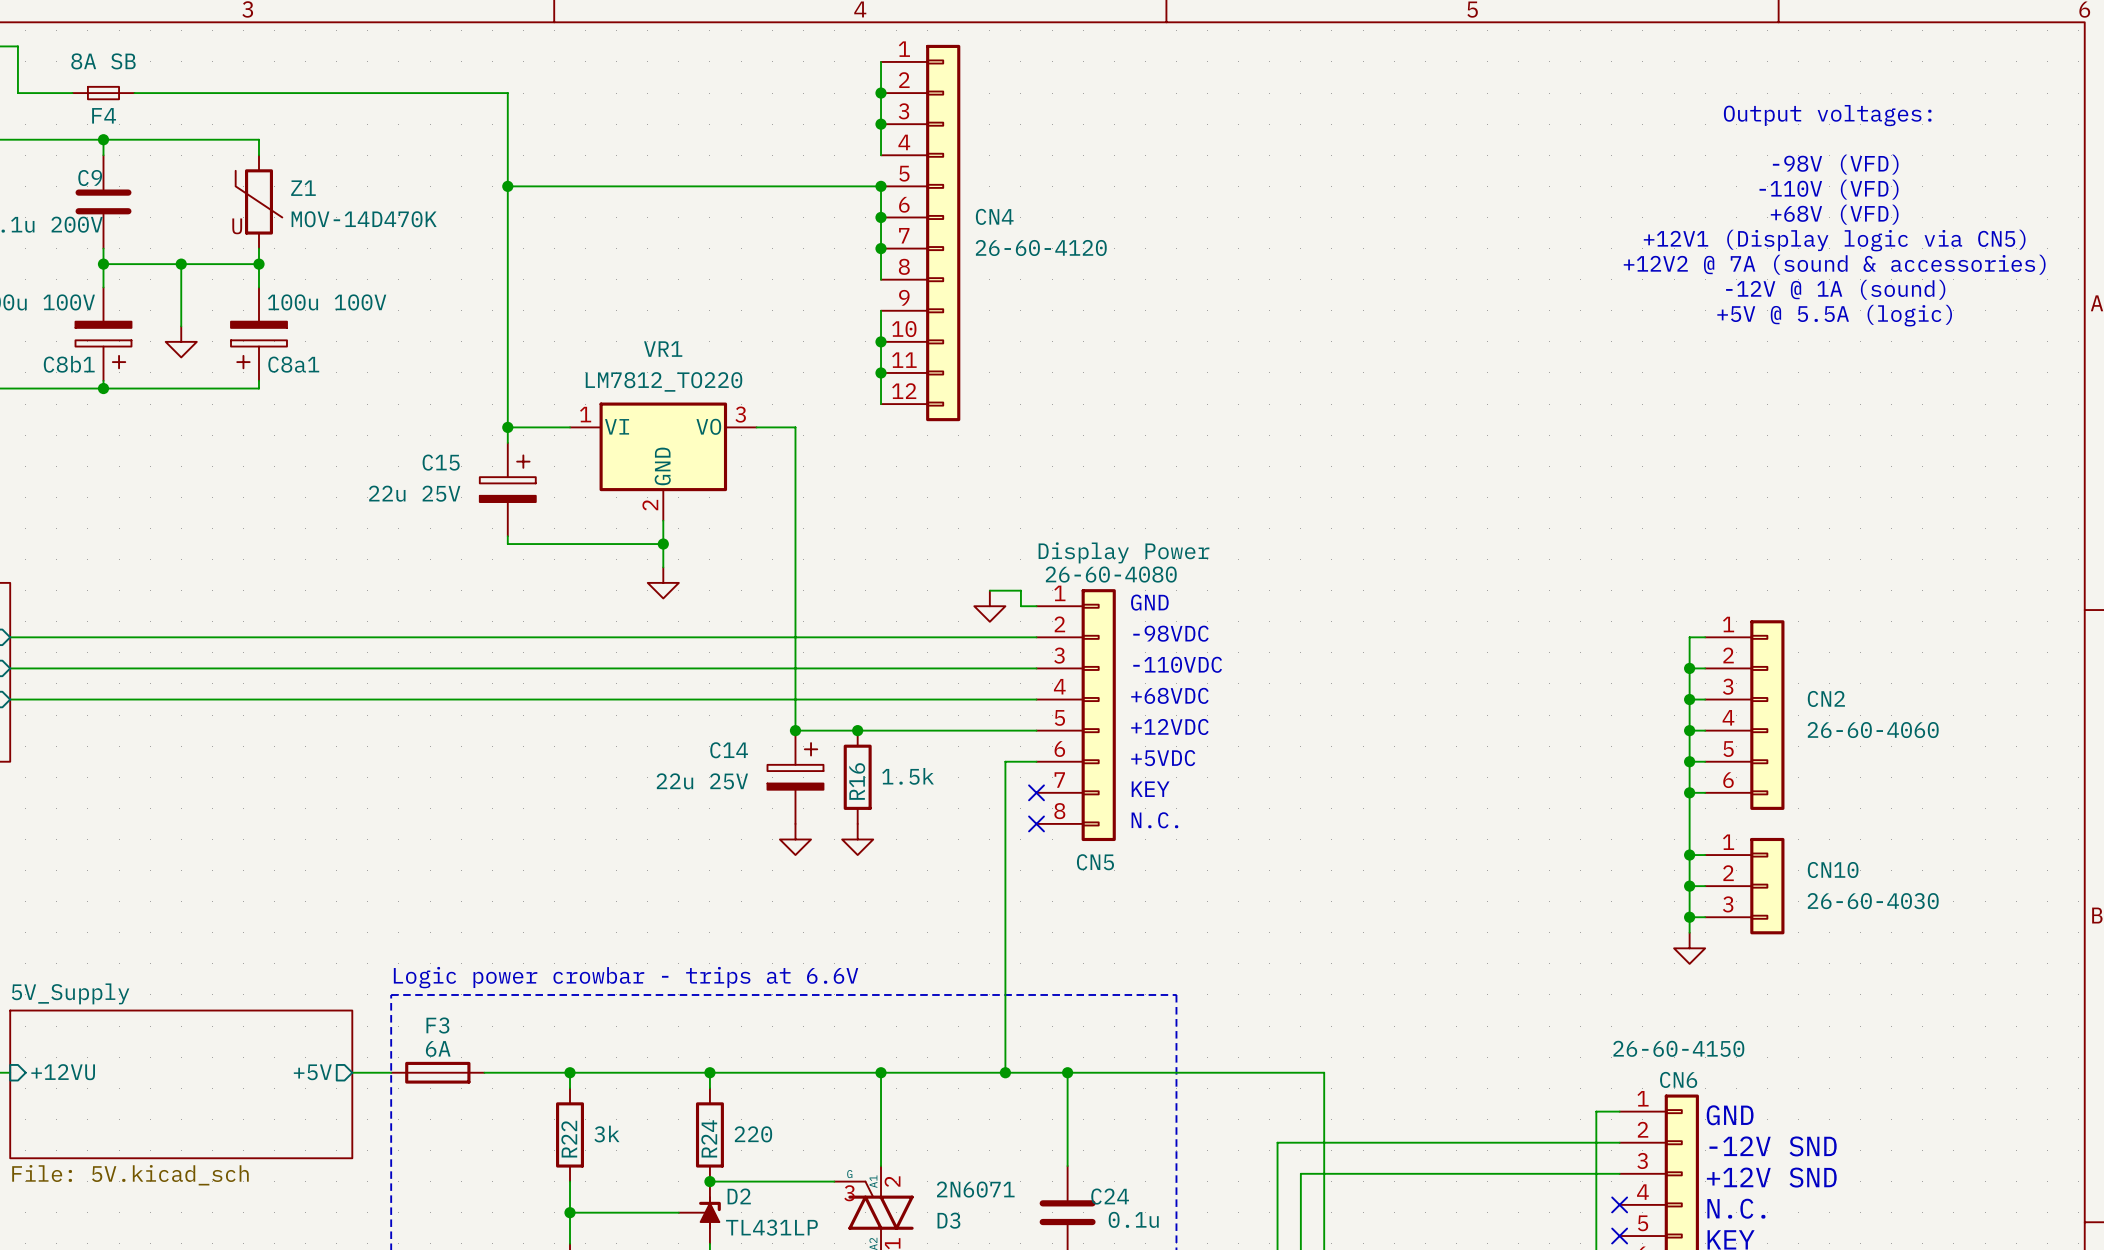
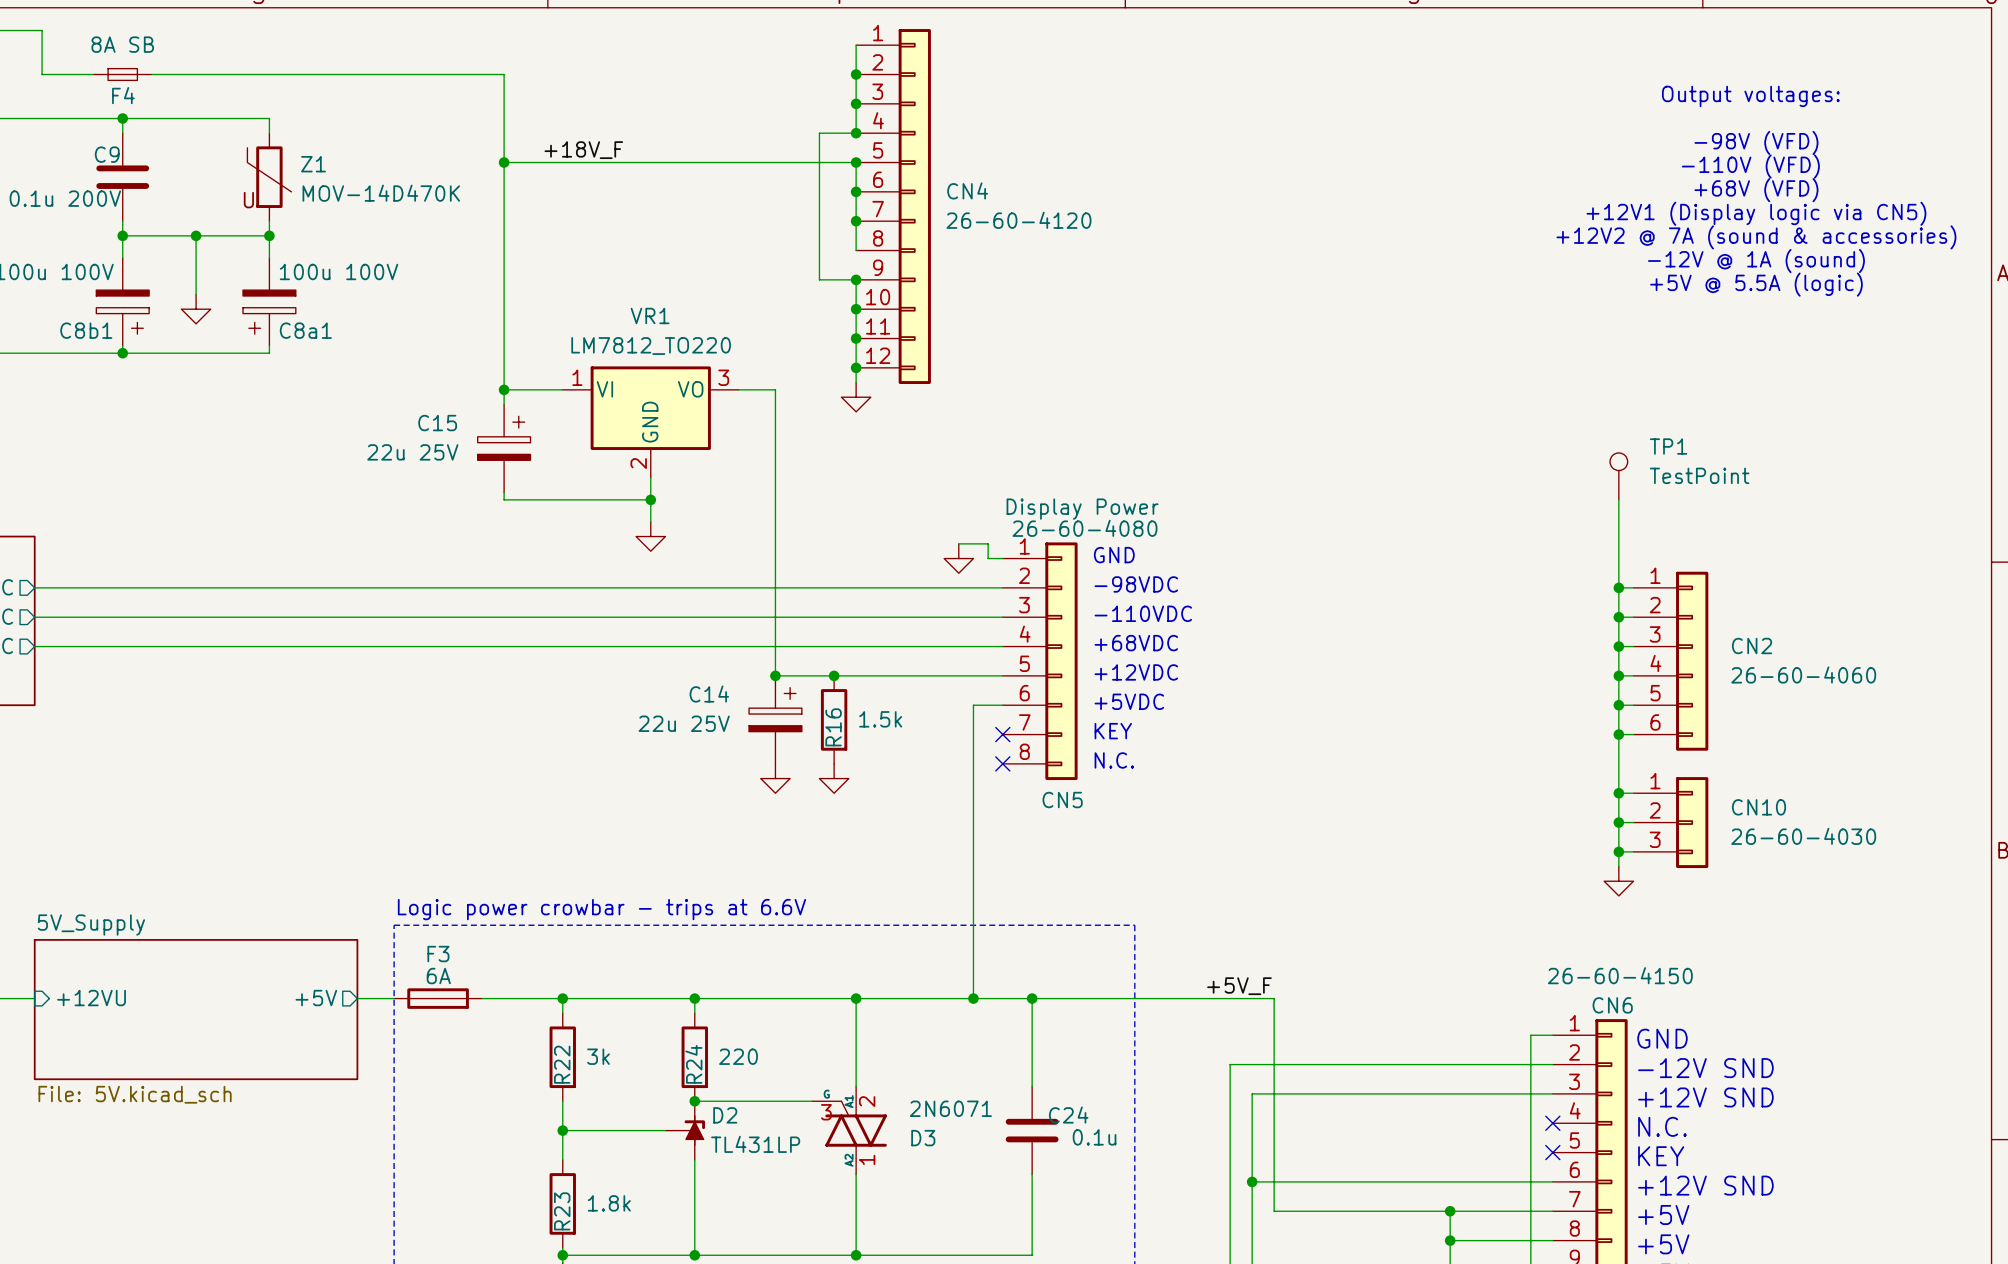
wire: none -> (856, 133) (819, 133) (819, 279) (856, 279)
junction: none -> (856, 133)
label: none -> +18V_F (583, 150)
junction: none -> (856, 279)
wire: none -> (856, 367) (856, 382)
junction: none -> (856, 367)
power symbol: none -> (856, 397)
TP1: none -> TestPoint (1618, 476)
wire: none -> (1618, 499) (1618, 587)
junction: none -> (1618, 587)
label: none -> +5V_F (1239, 986)

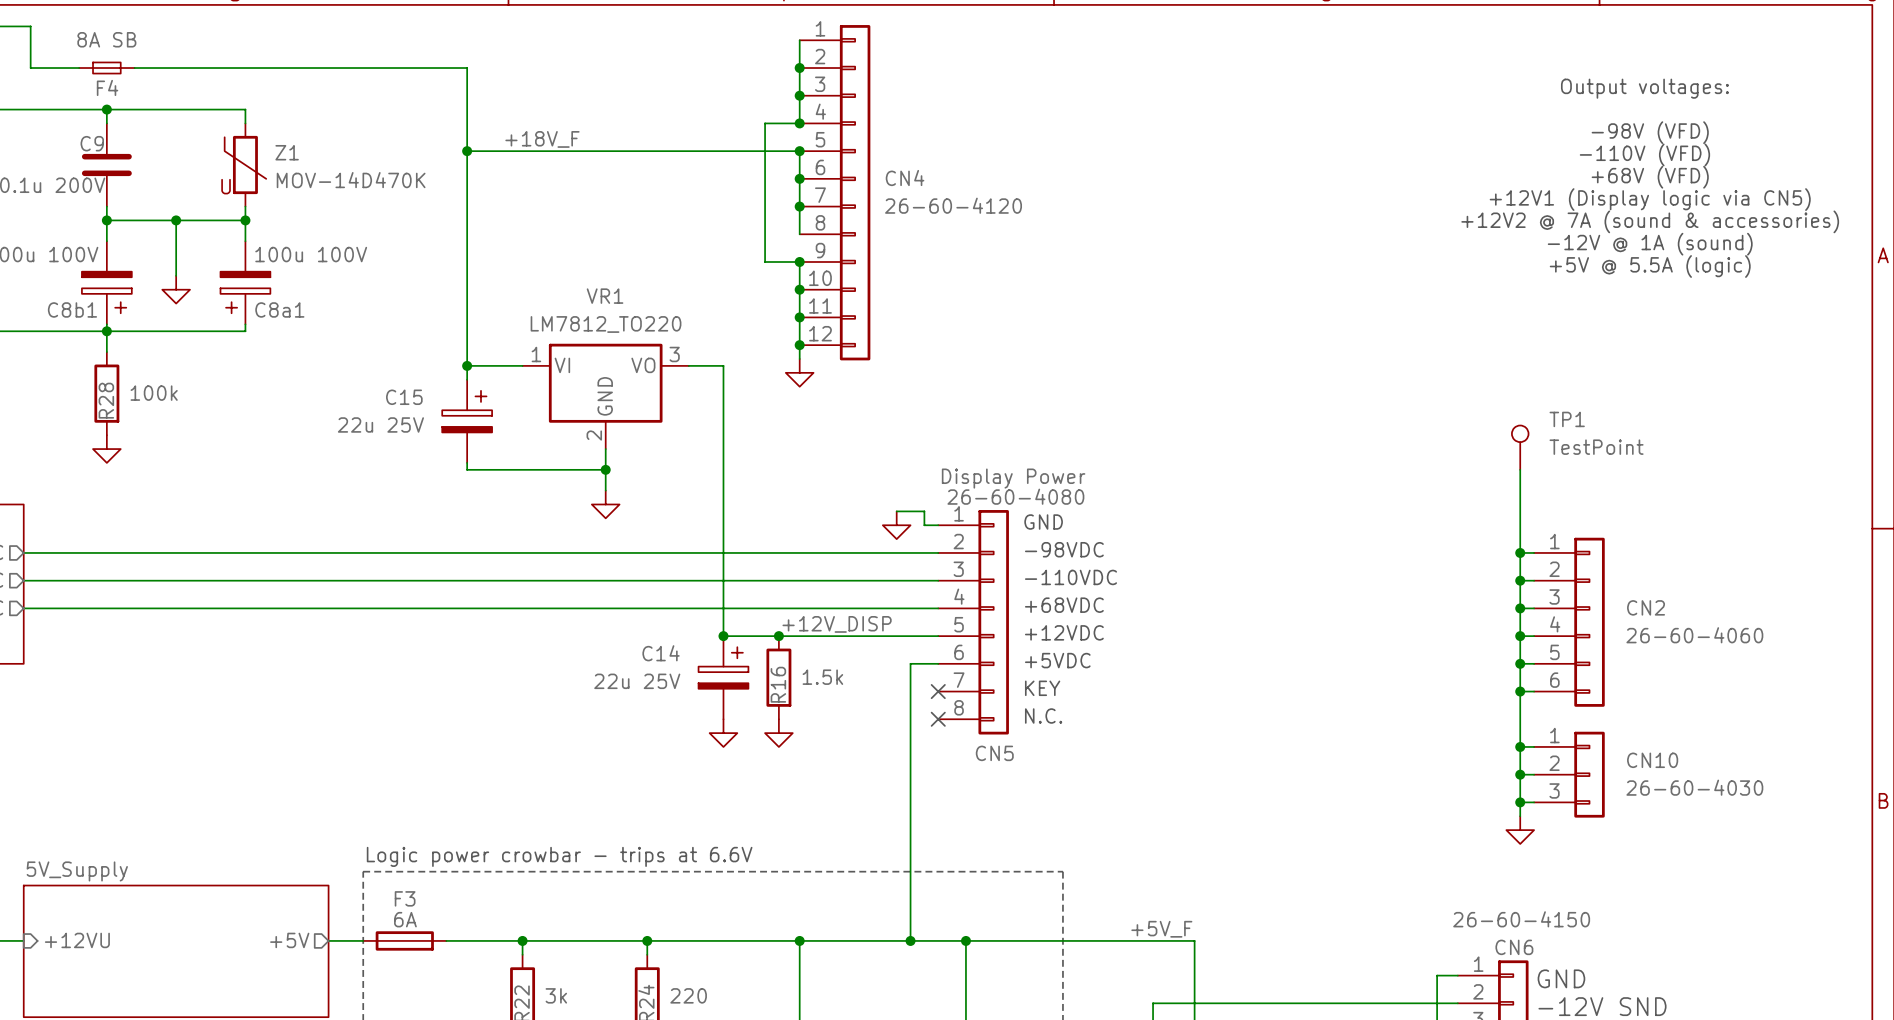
wire: none -> (106, 331) (106, 352)
R28: none -> 100k (106, 393)
power symbol: none -> (106, 449)
label: none -> +12V_DISP (837, 624)

